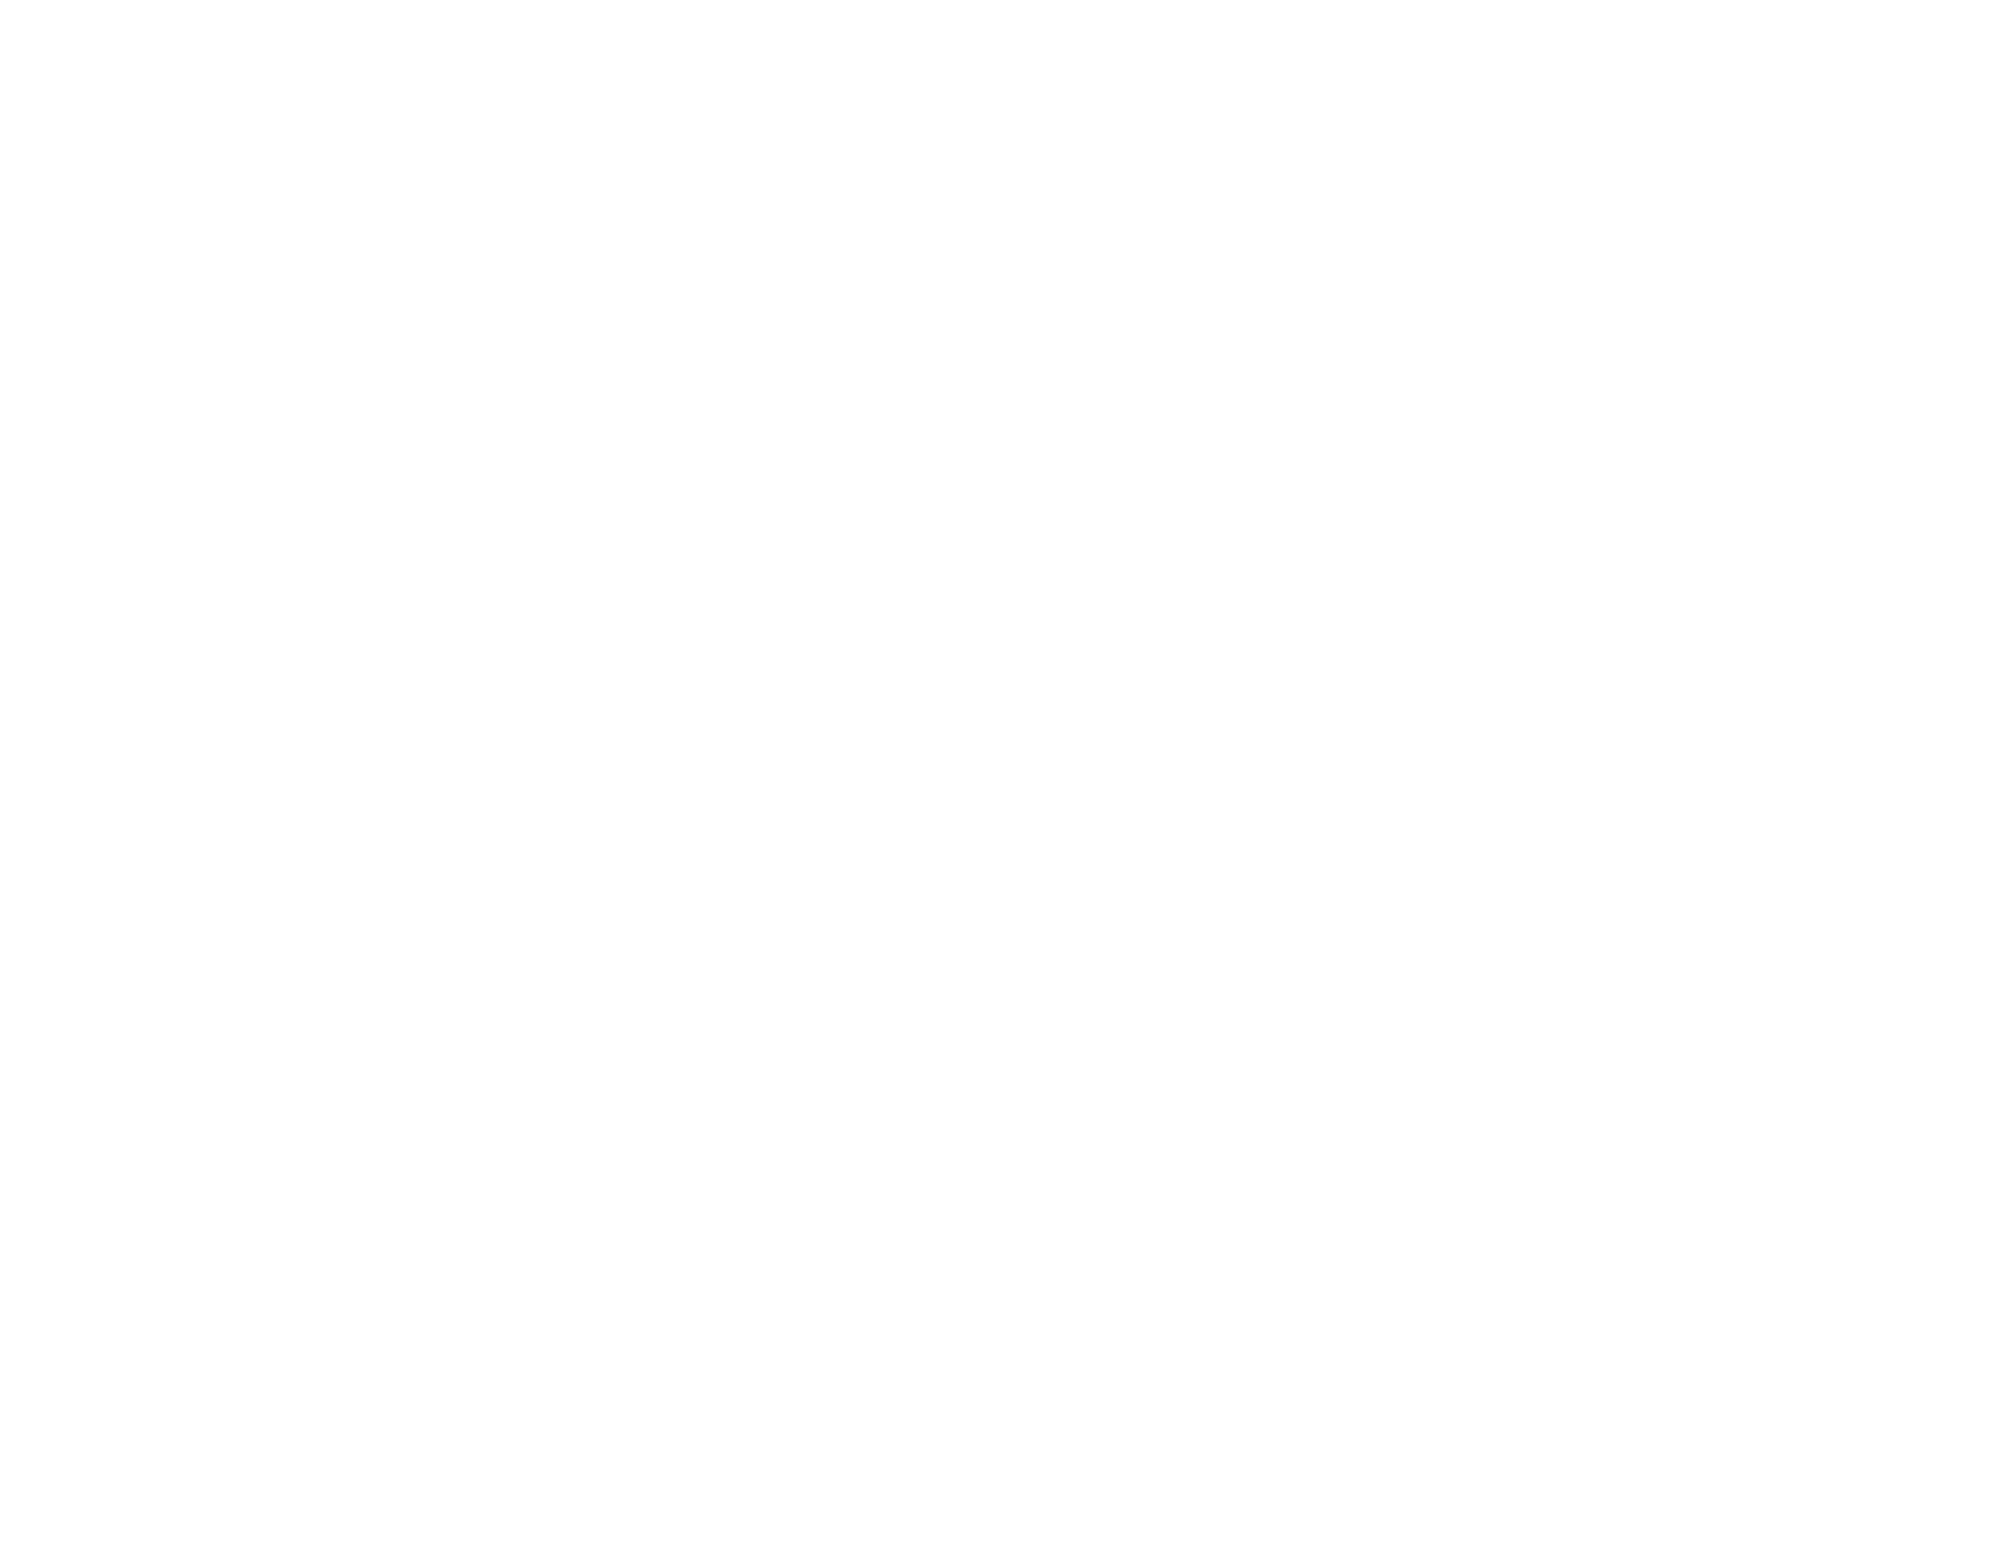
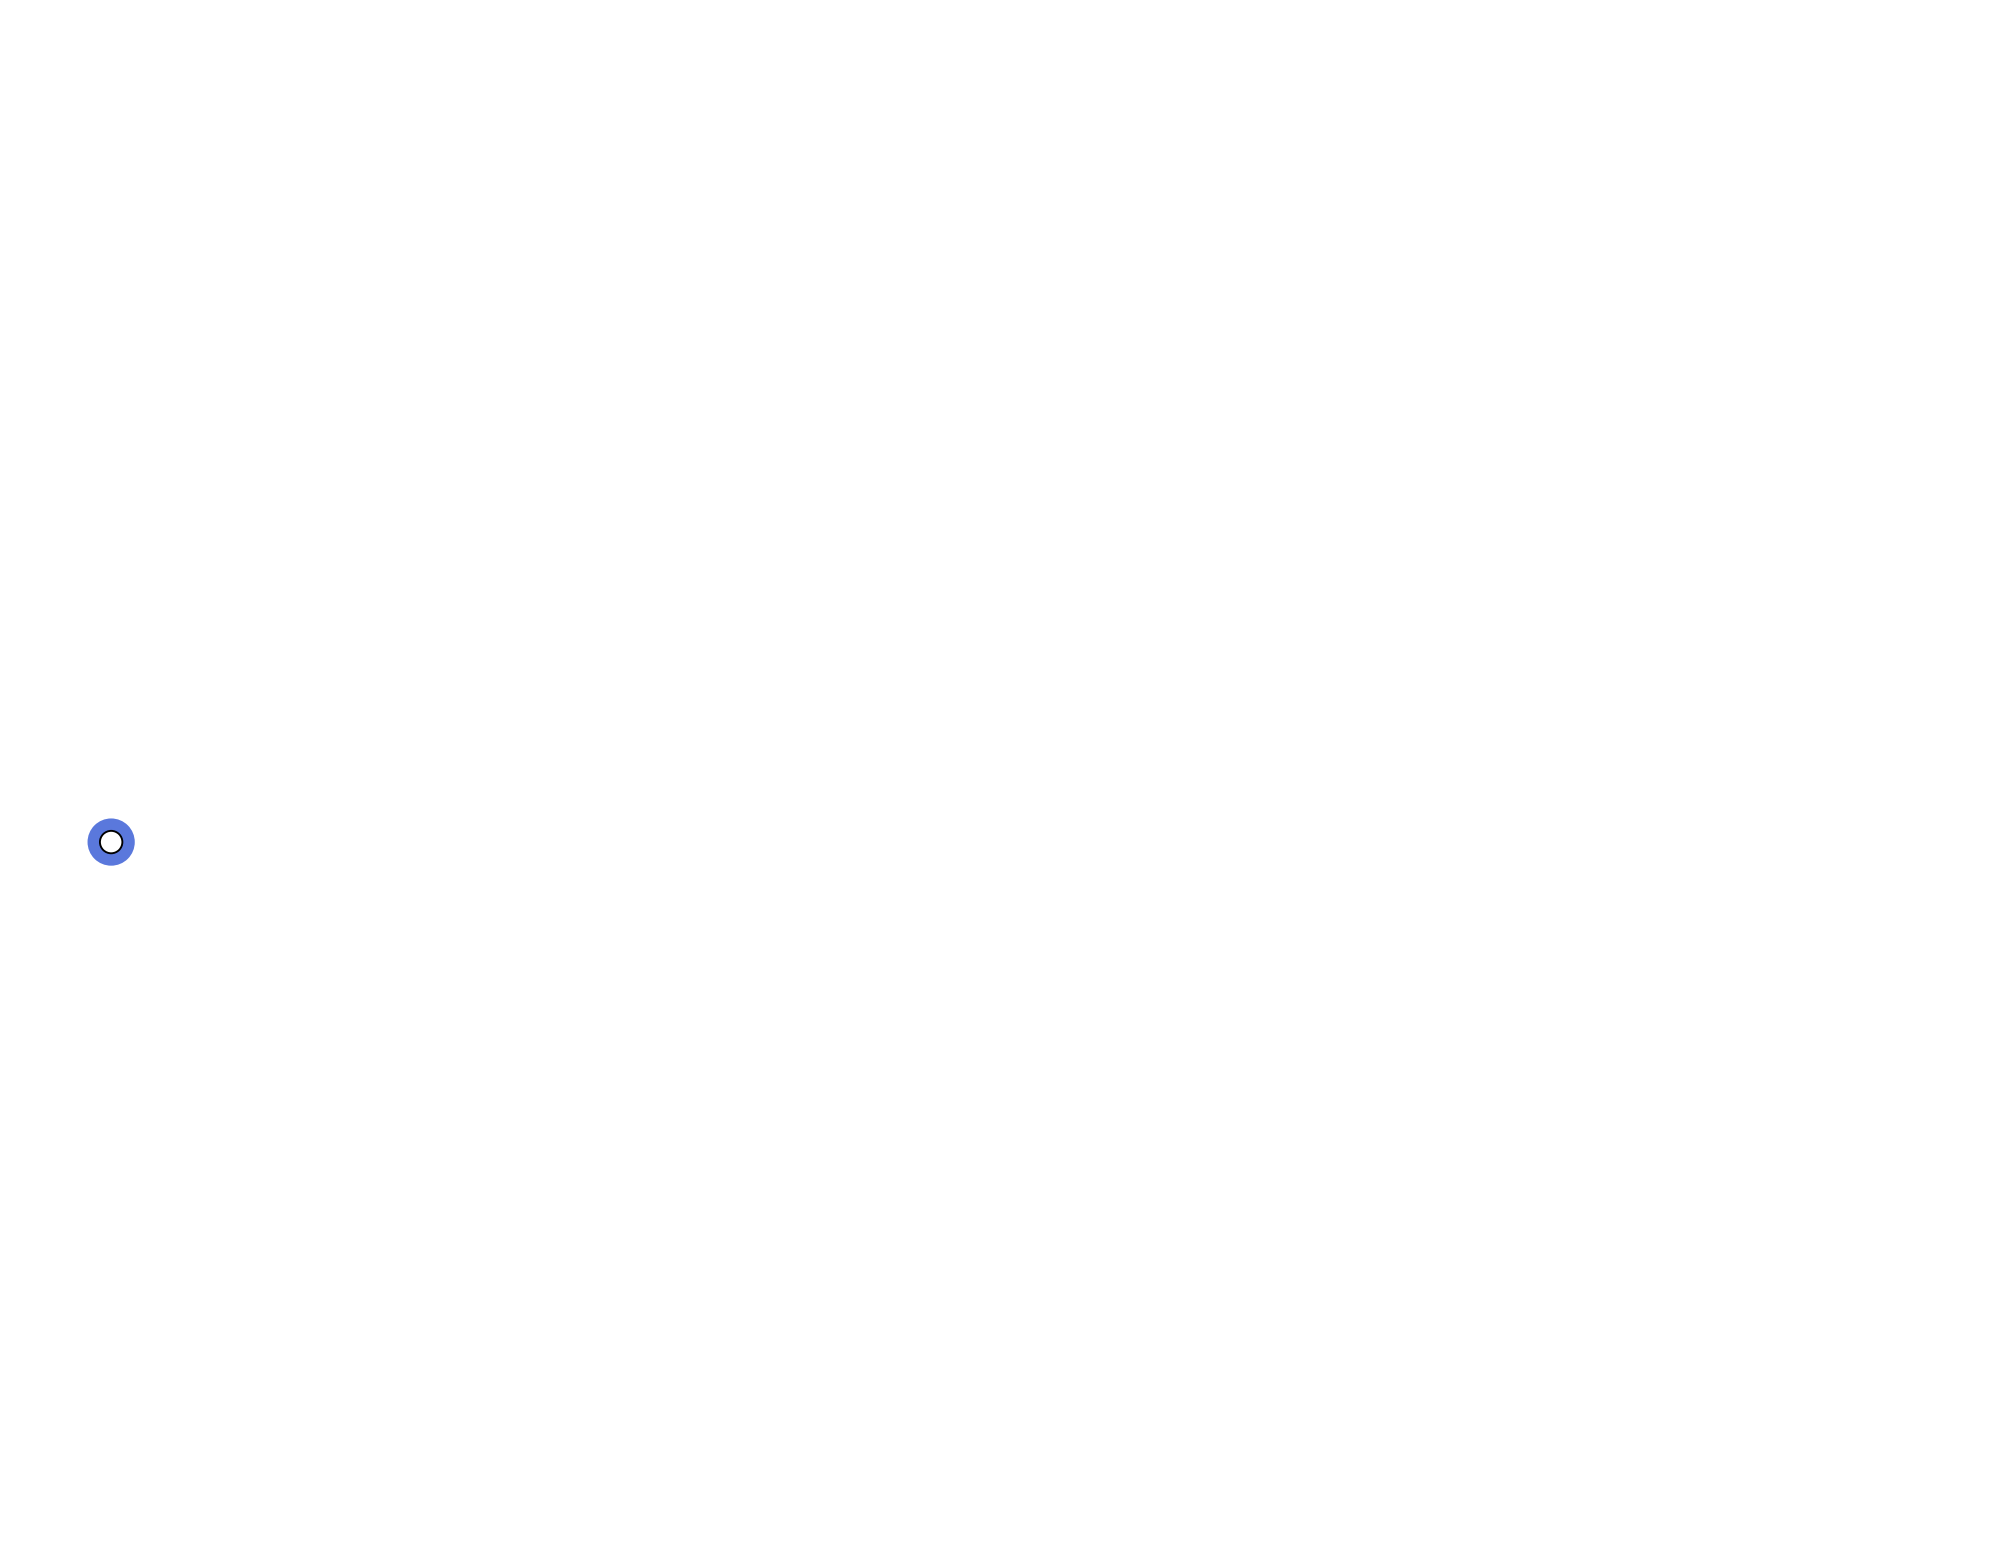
part: none -> (111, 842)

